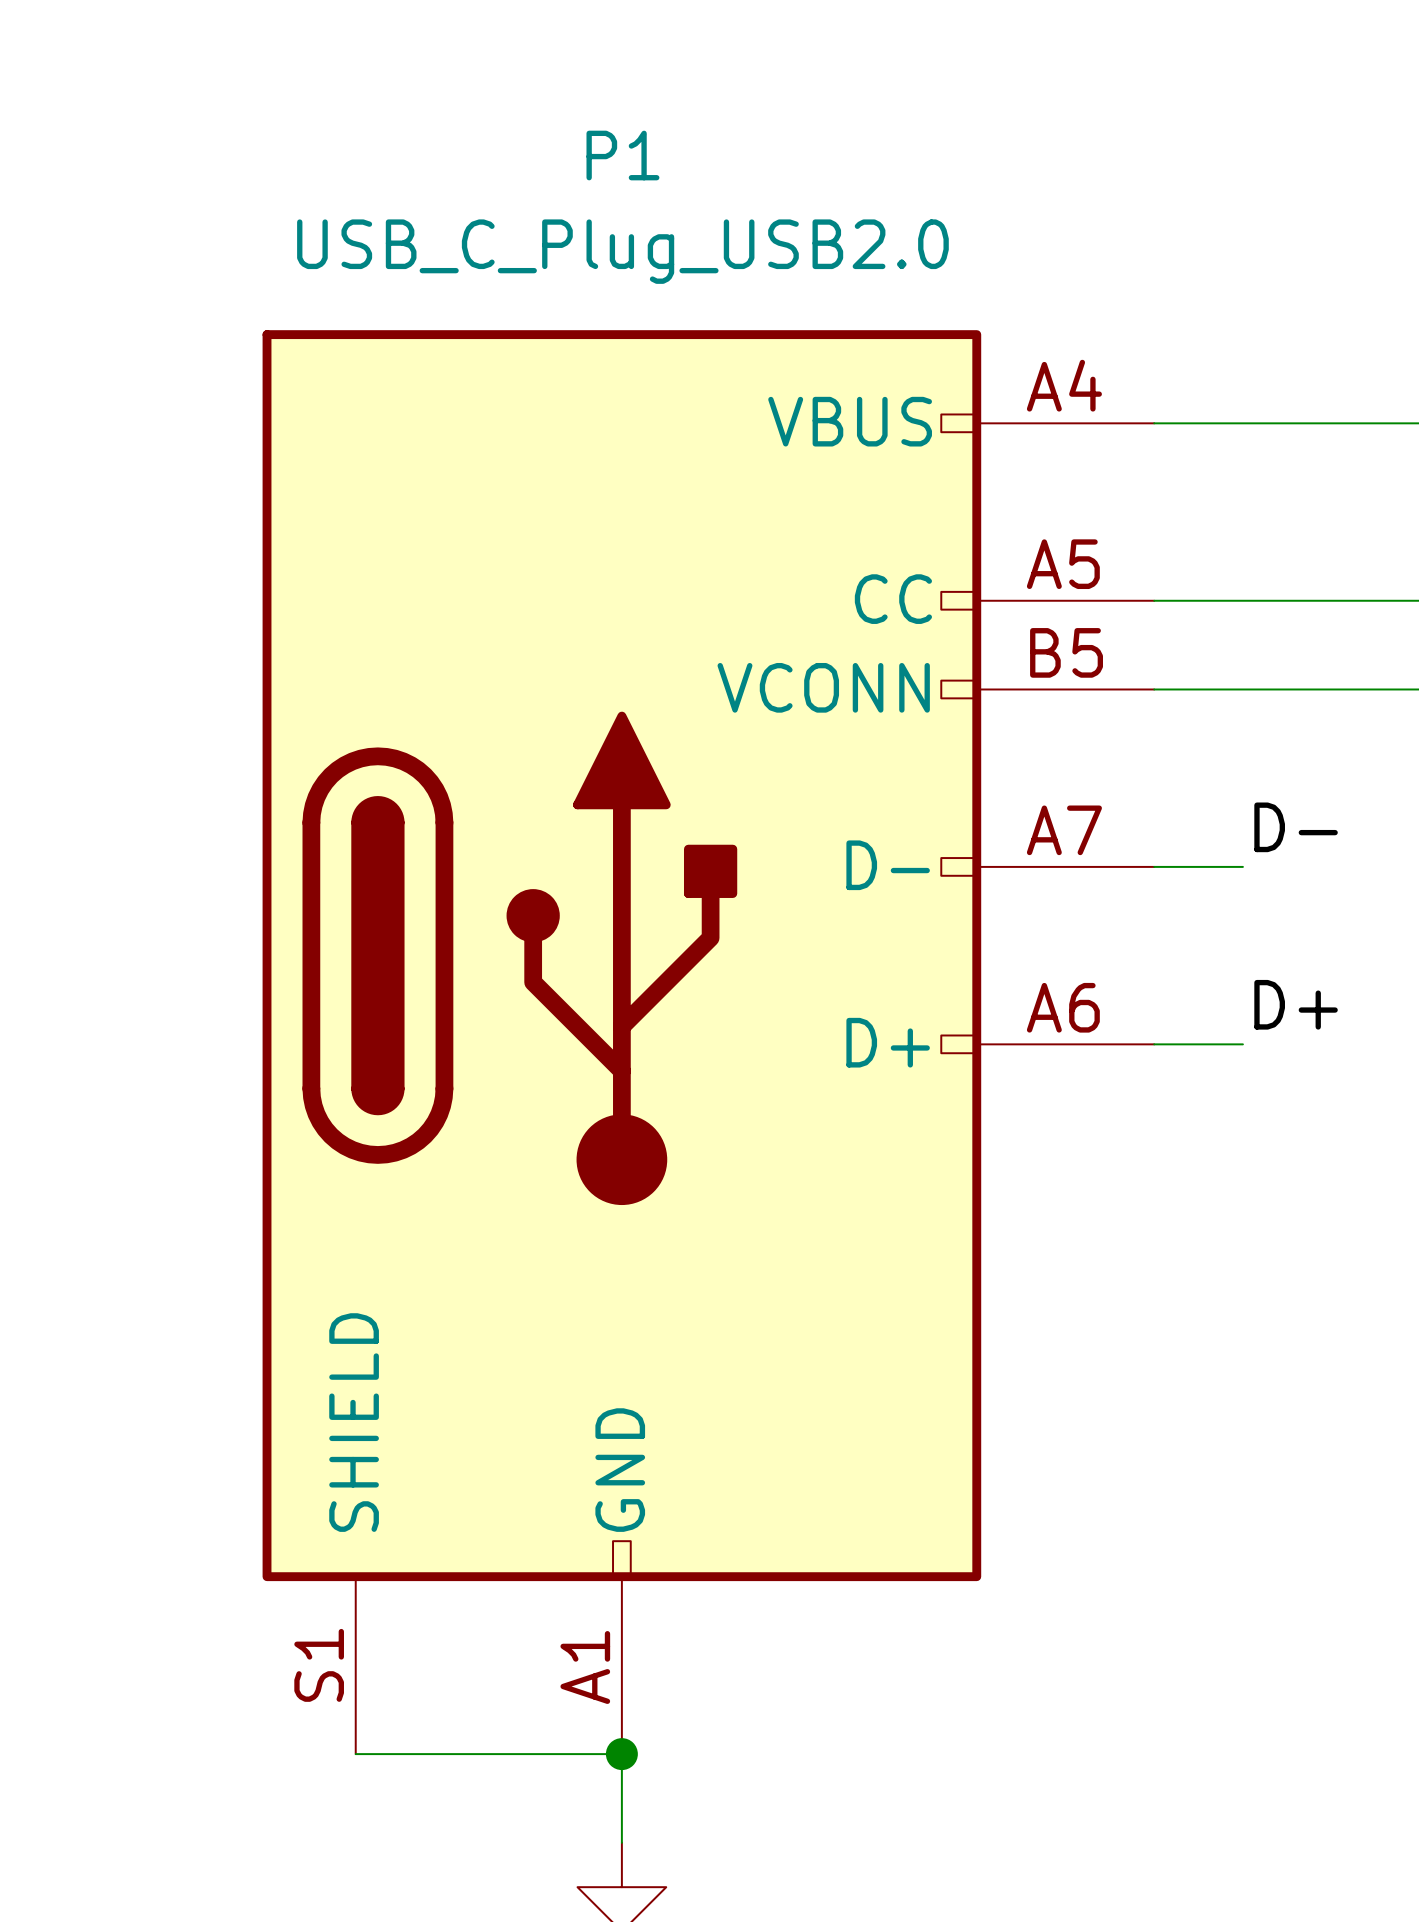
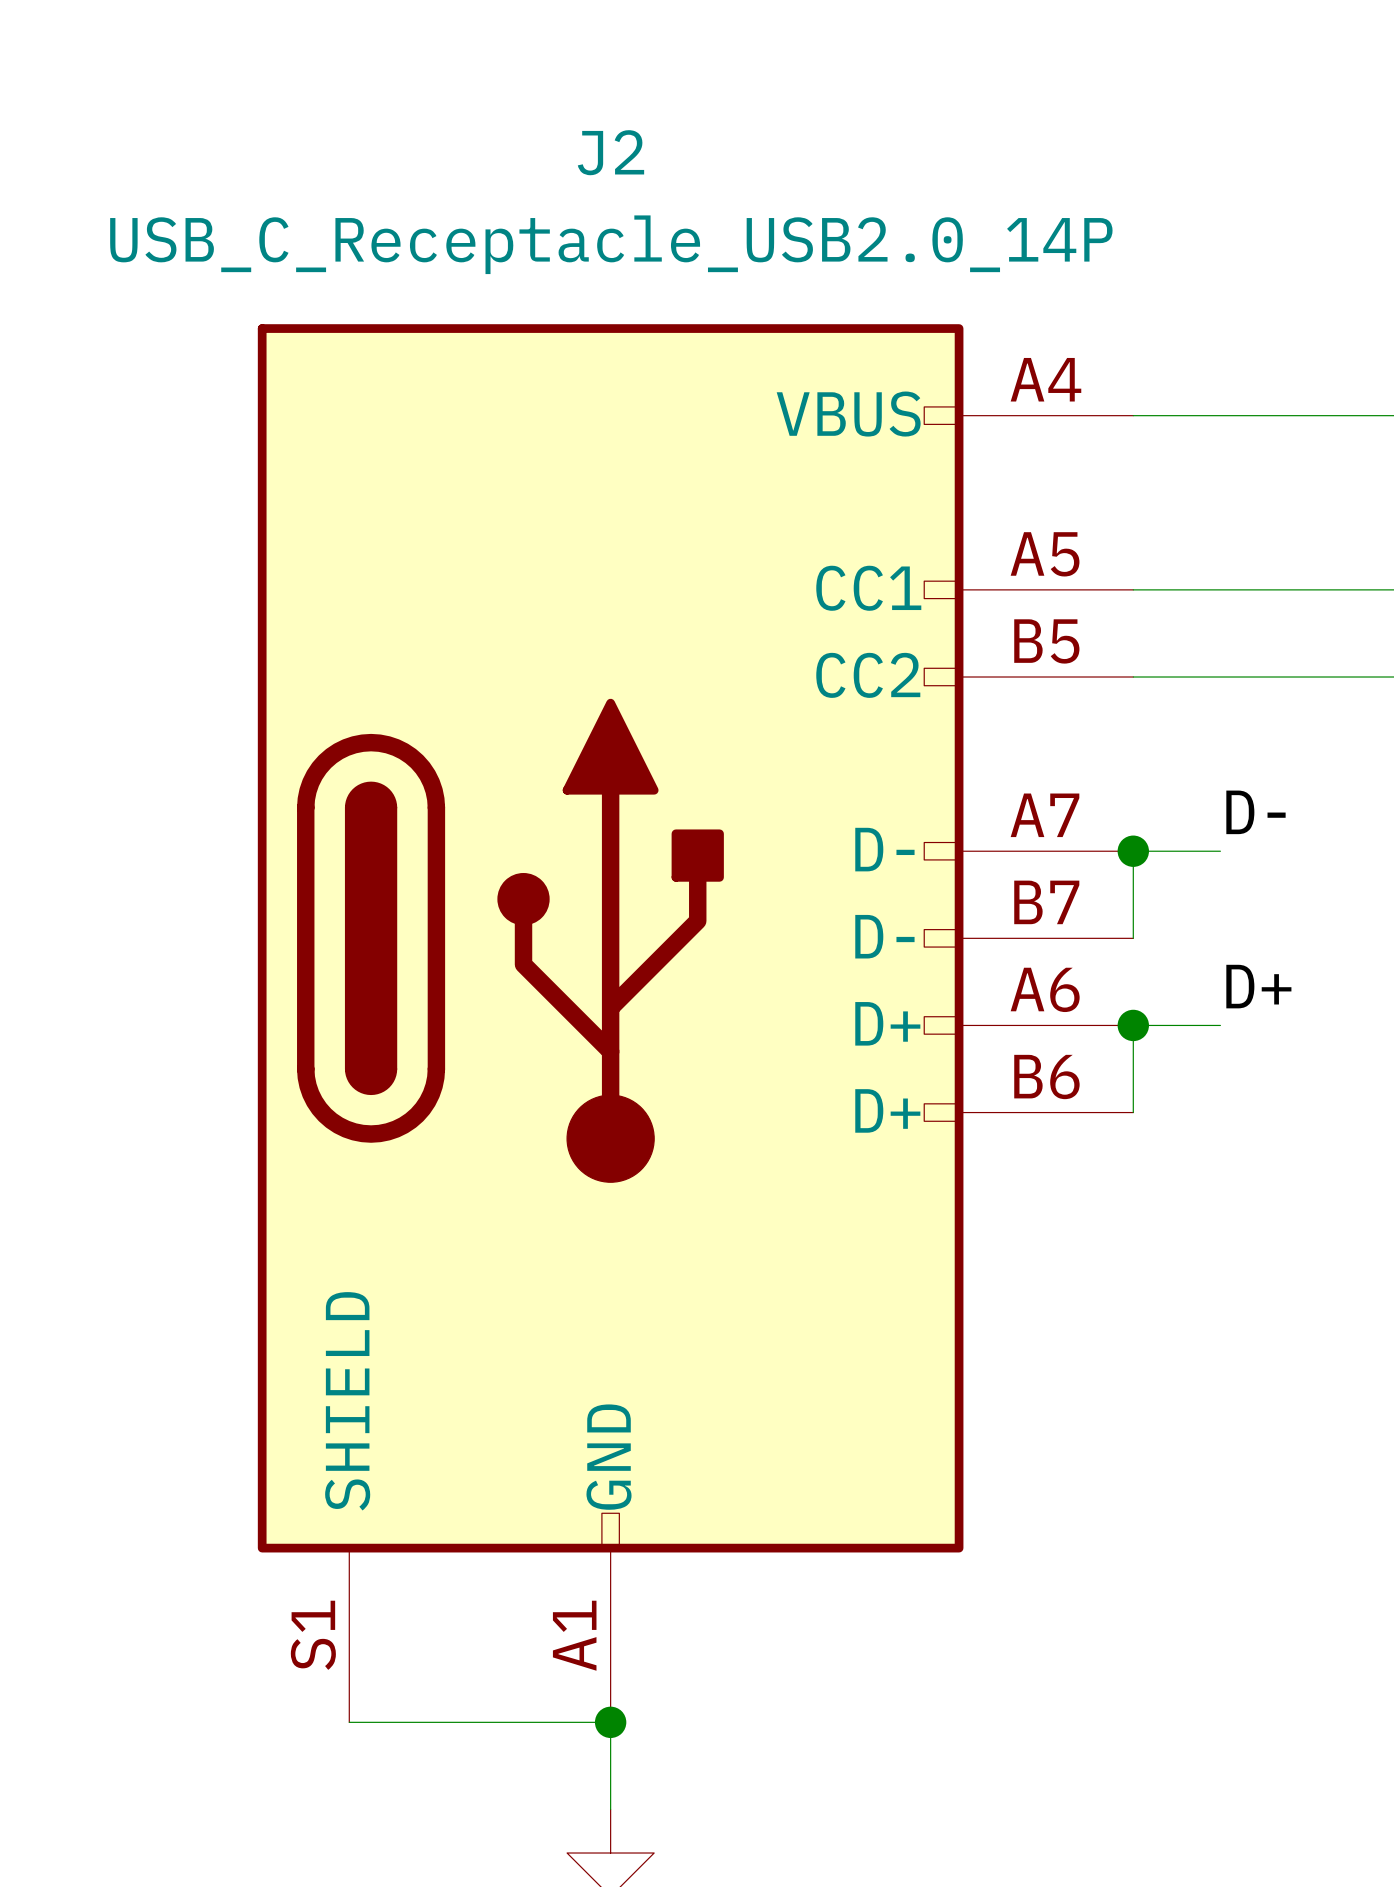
wire: none -> (1133, 851) (1133, 938)
junction: none -> (1133, 851)
P1: USB_C_Plug_USB2.0 (708, 1042) -> none
J2: none -> USB_C_Receptacle_USB2.0_14P (695, 1023)
wire: none -> (1133, 1025) (1133, 1112)
junction: none -> (1133, 1025)

